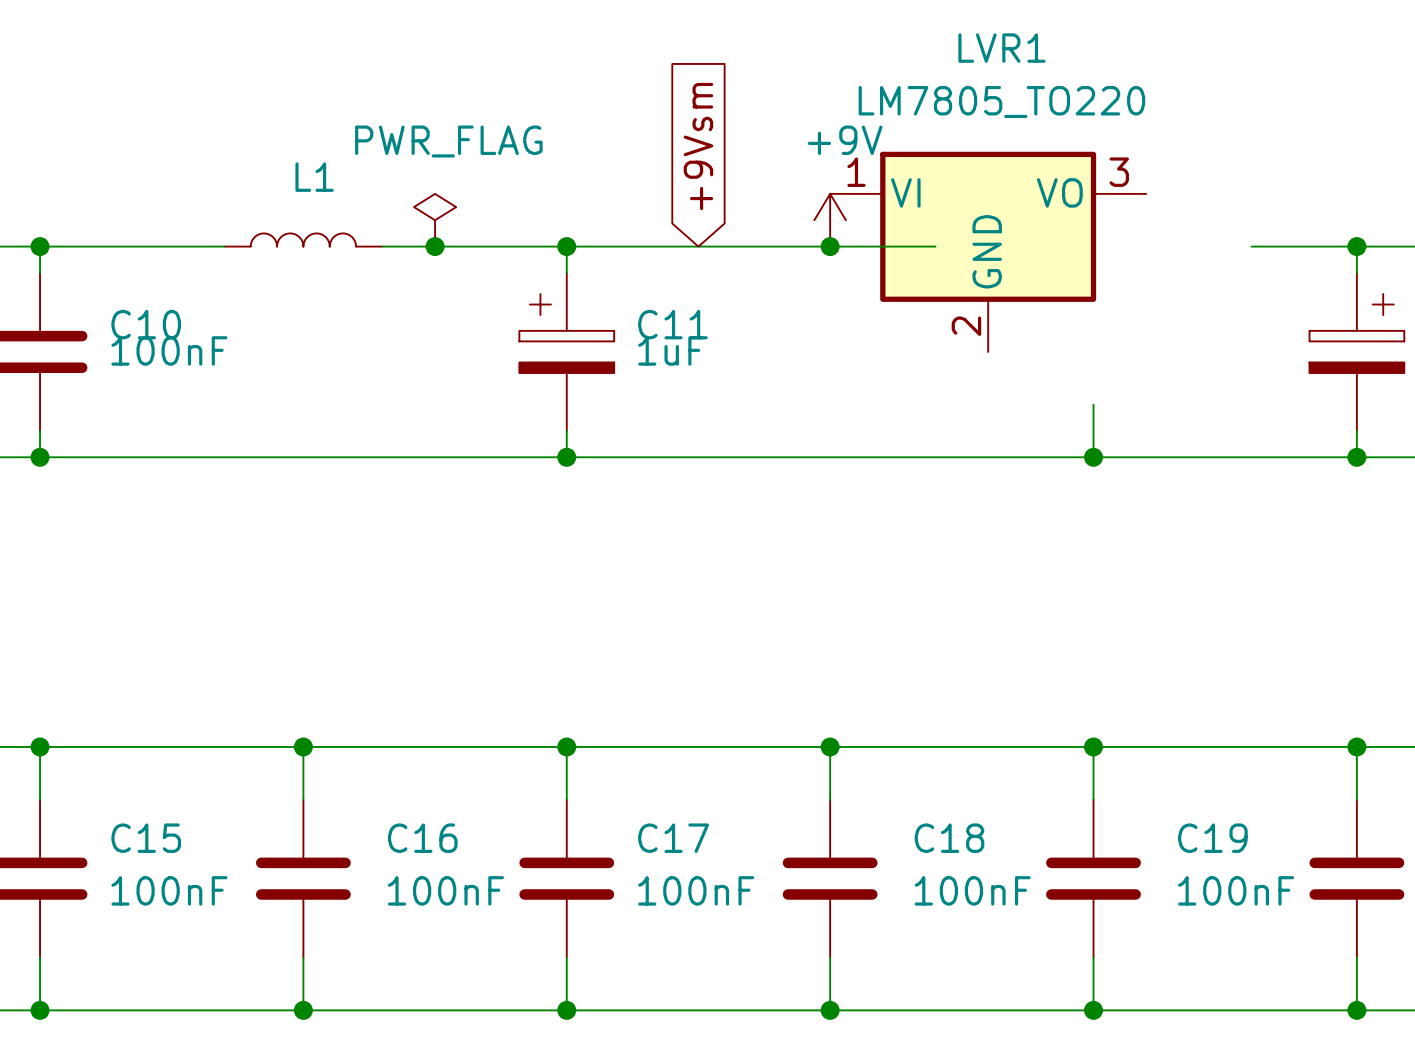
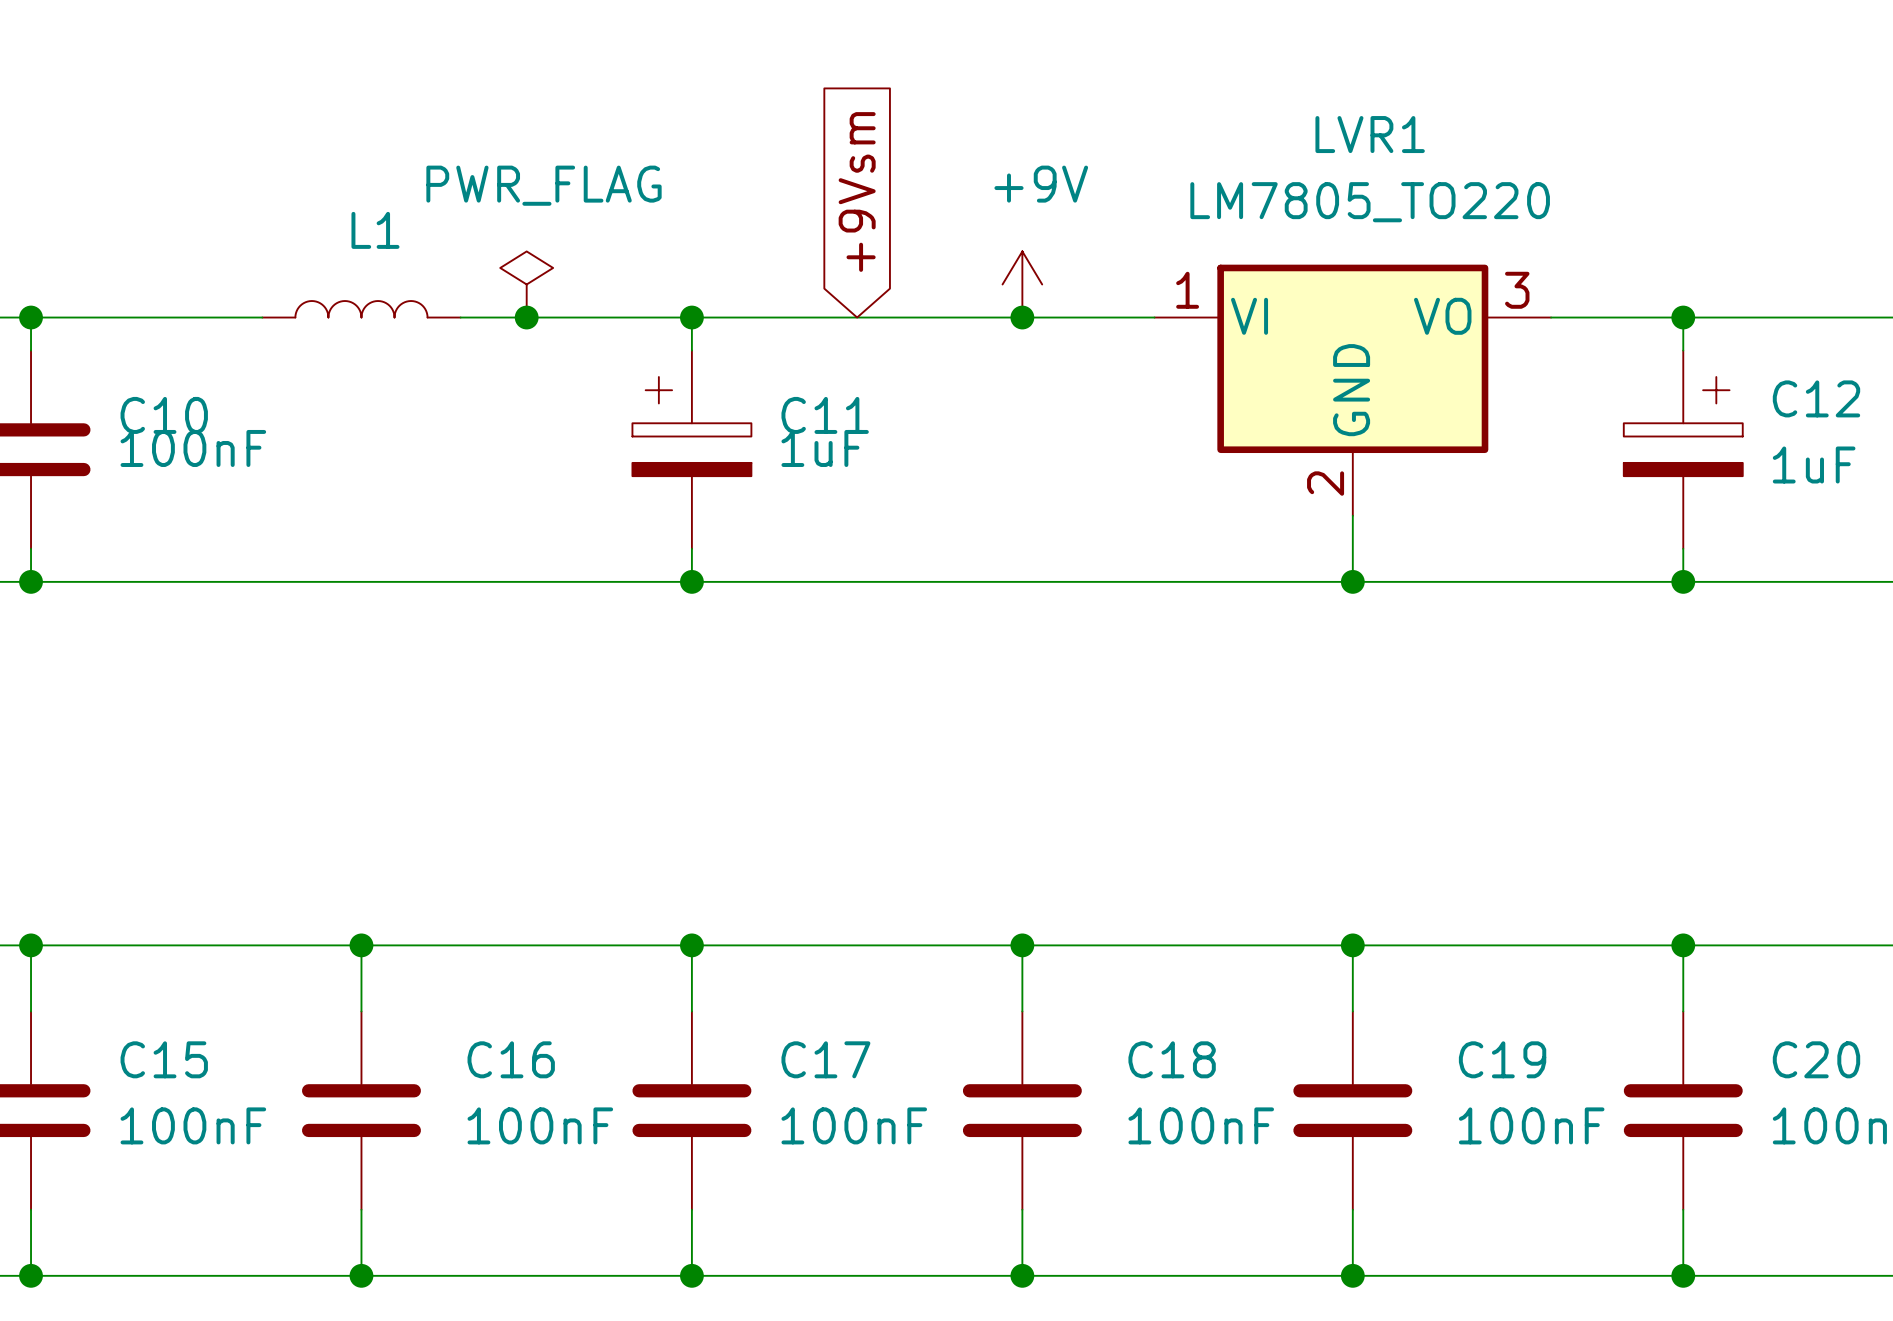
LVR1 position: (988, 251) -> (1352, 390)

